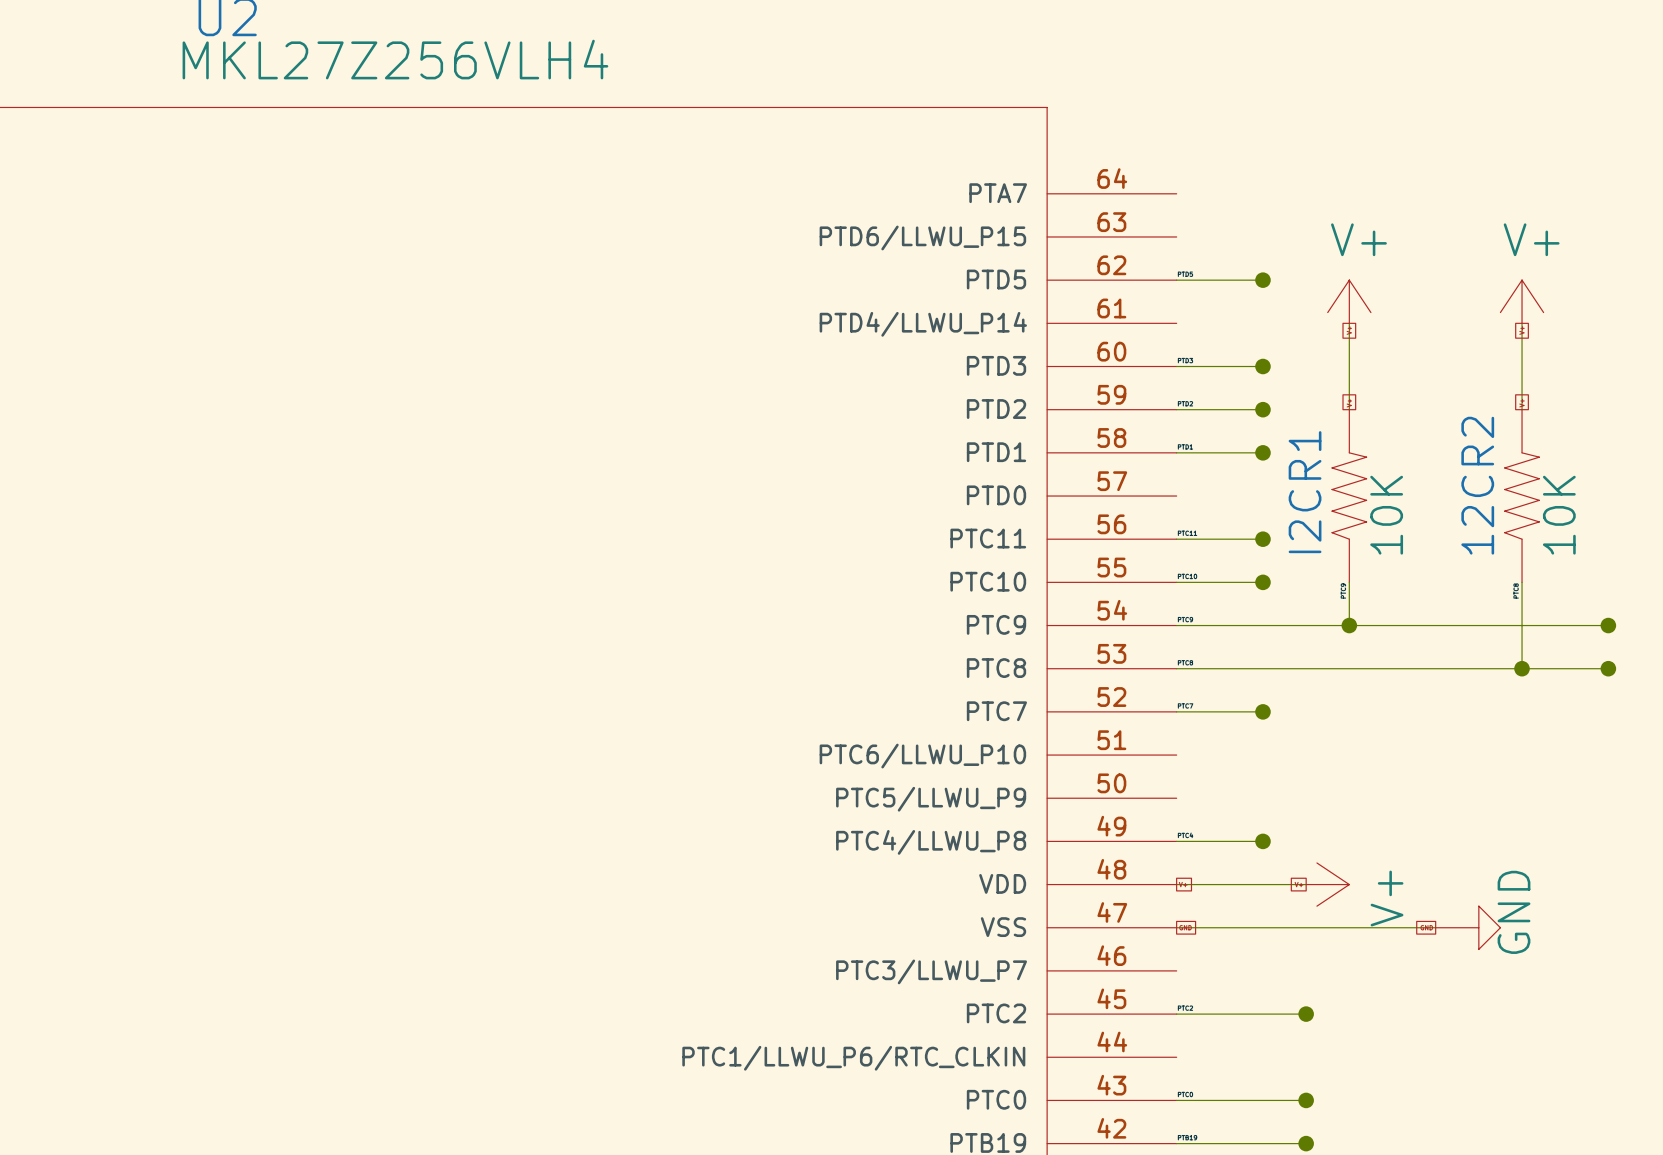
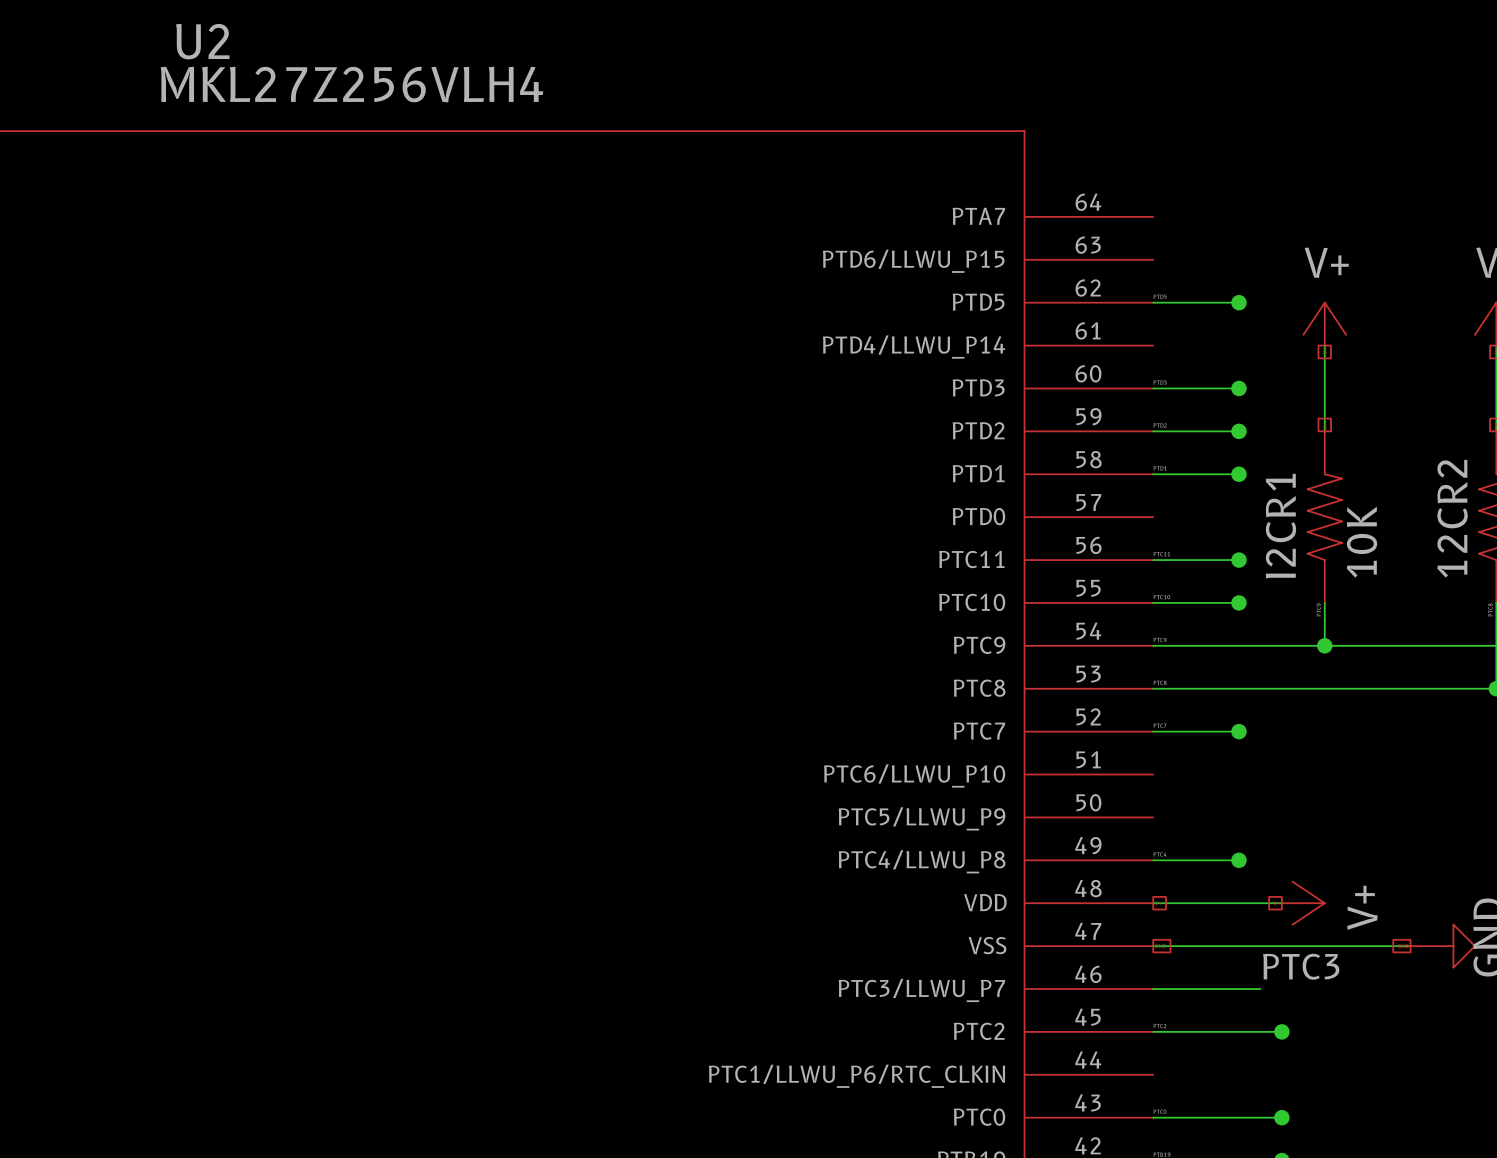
label: none -> PTC3 (1301, 966)
wire: none -> (1153, 989) (1260, 989)

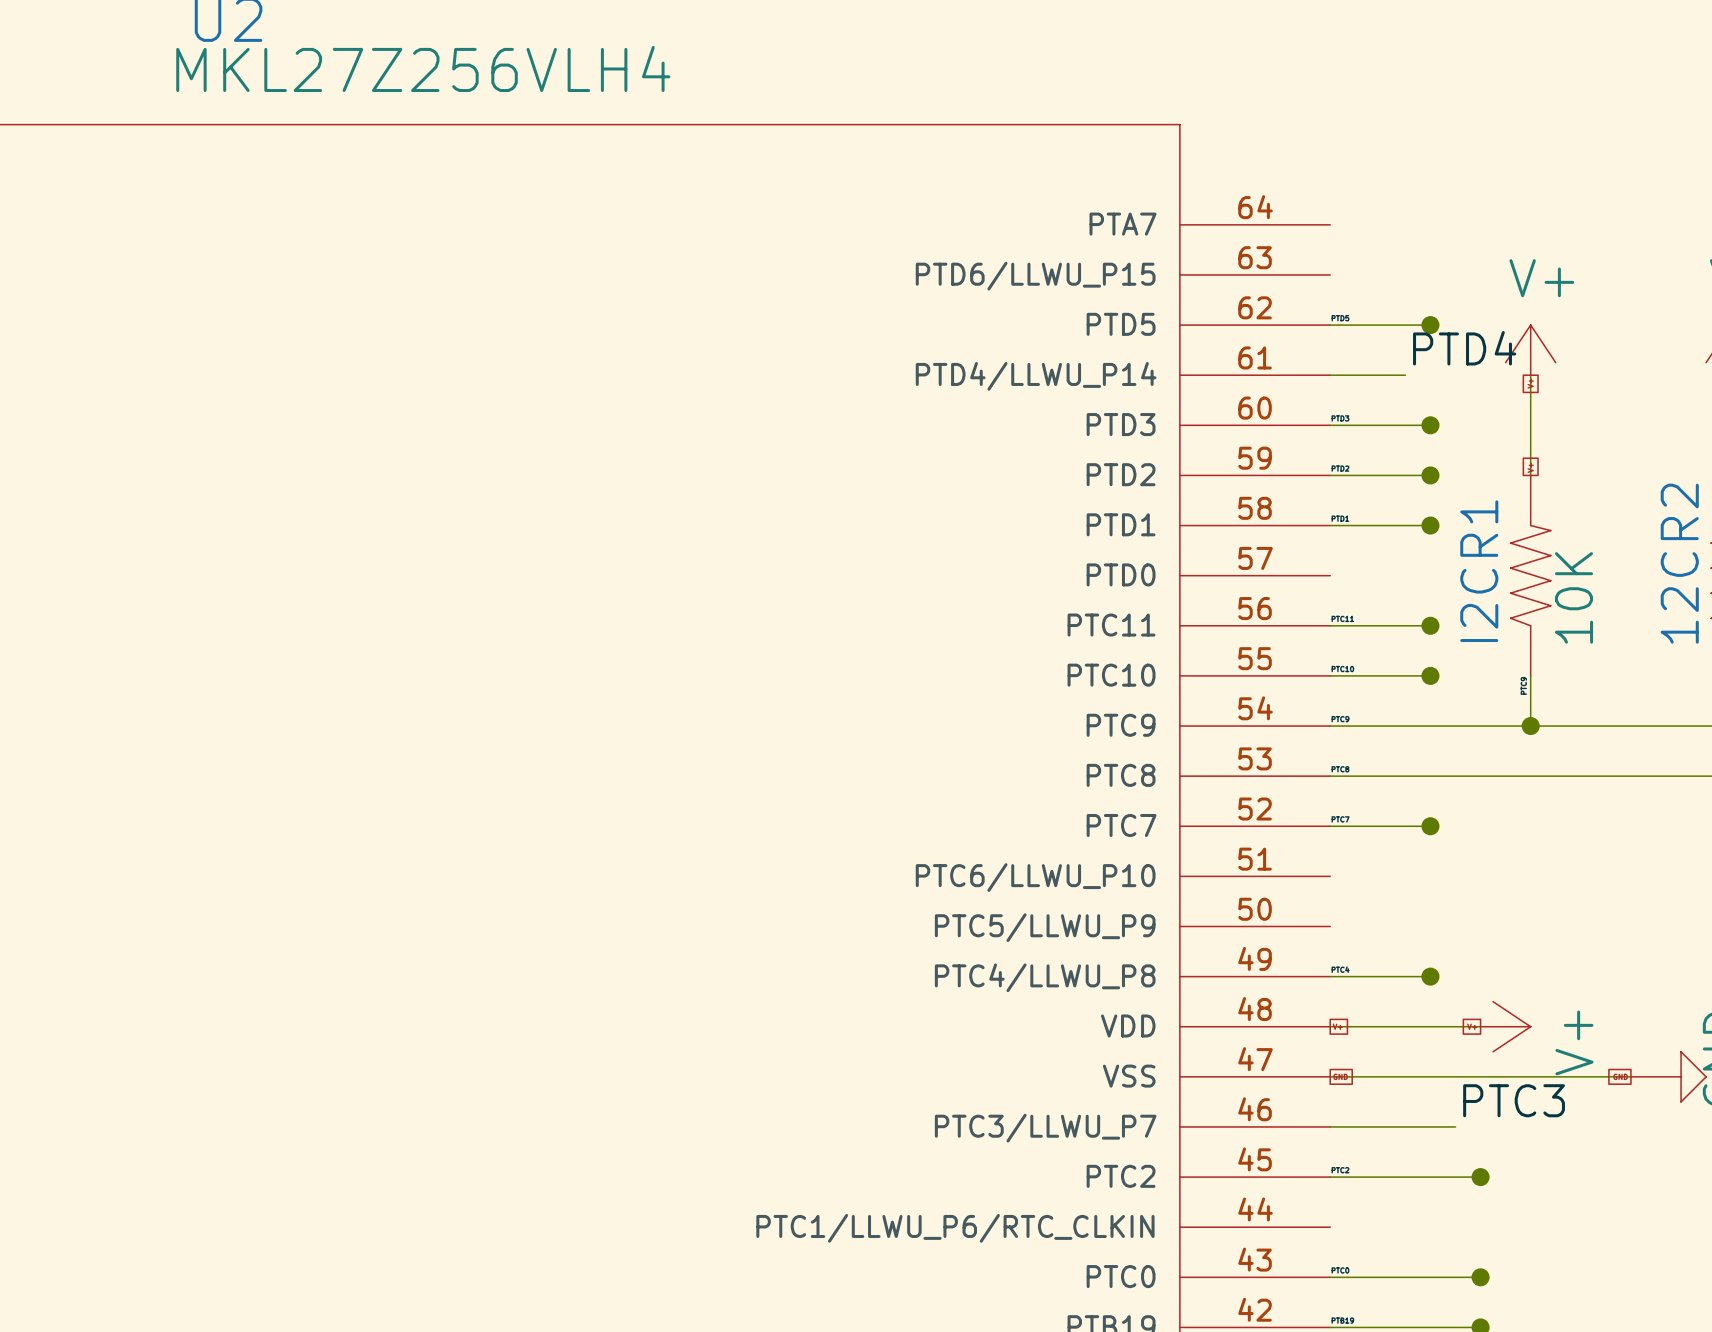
label: none -> PTD4 (1464, 348)
wire: none -> (1330, 375) (1405, 375)

